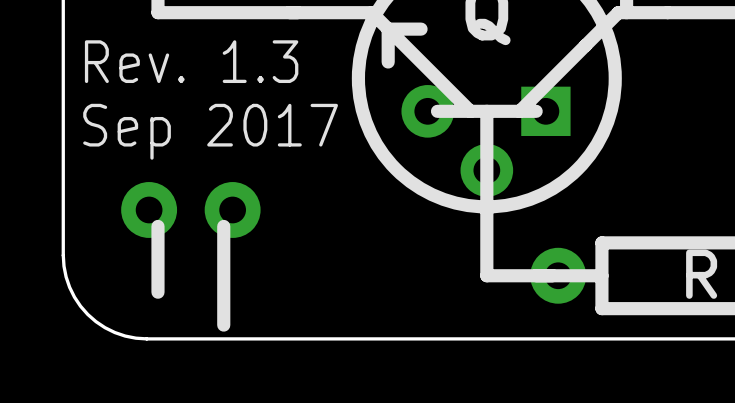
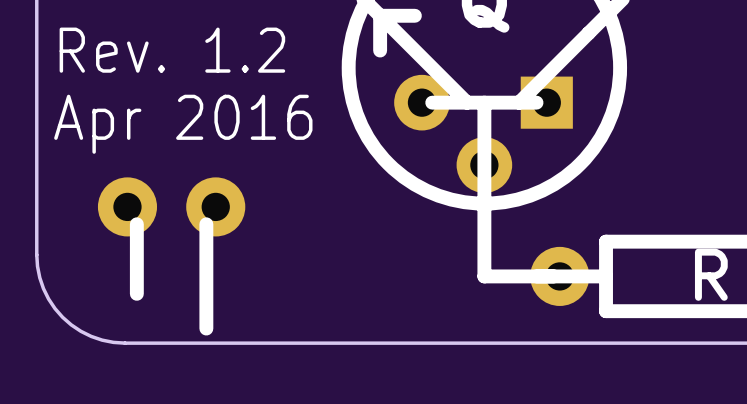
text: Rev. 1.3 (191, 61) -> Rev. 1.2 (172, 50)
text: Sep 2017 (210, 131) -> Apr 2016 (183, 124)

